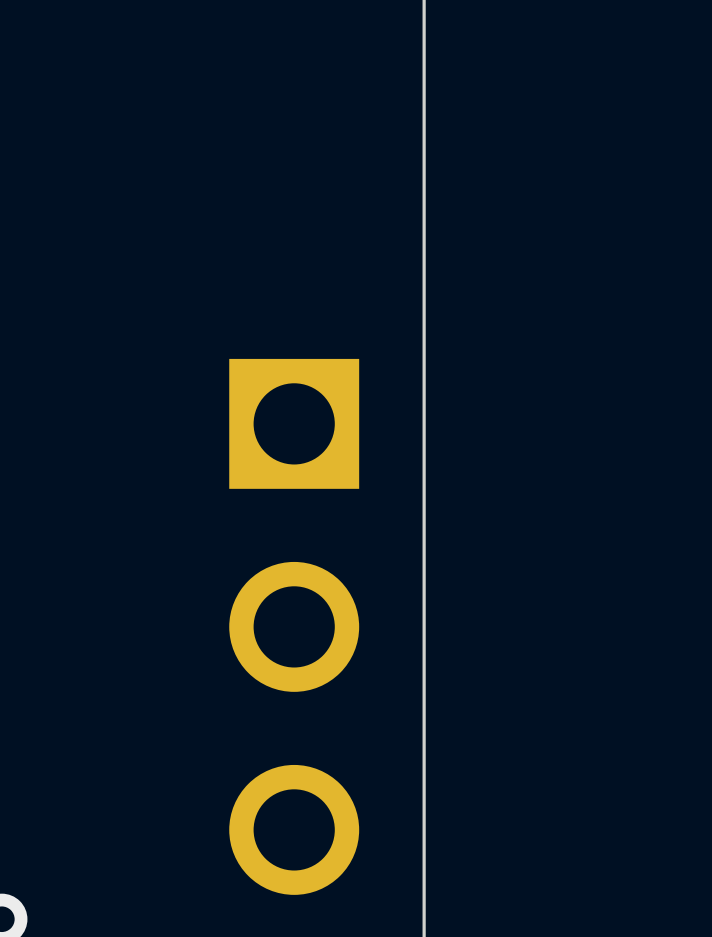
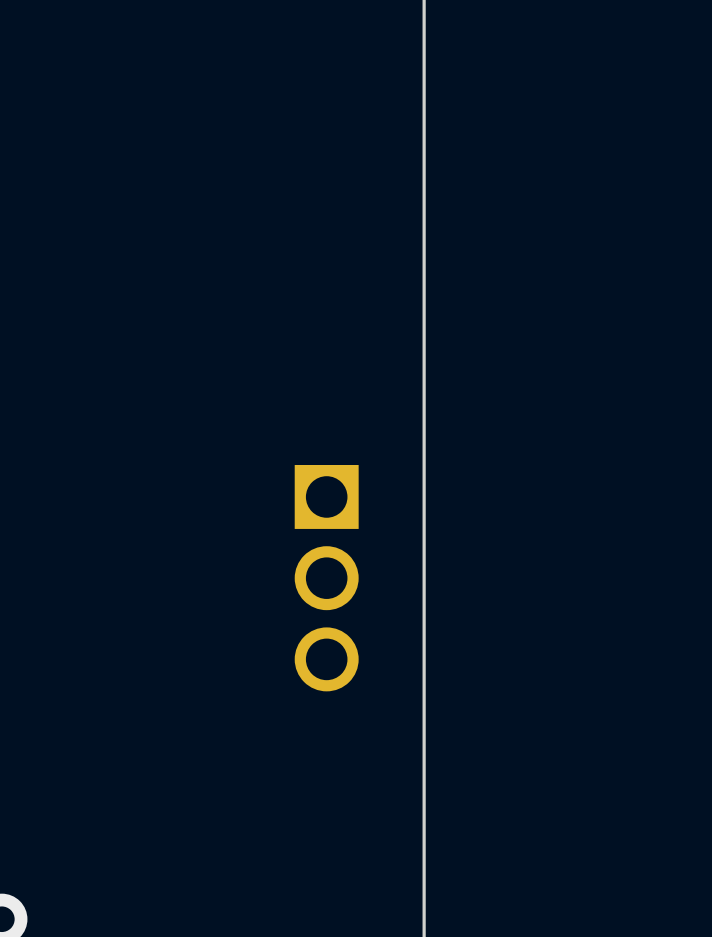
part footprint: [229, 358, 360, 895] -> [294, 465, 359, 692]

